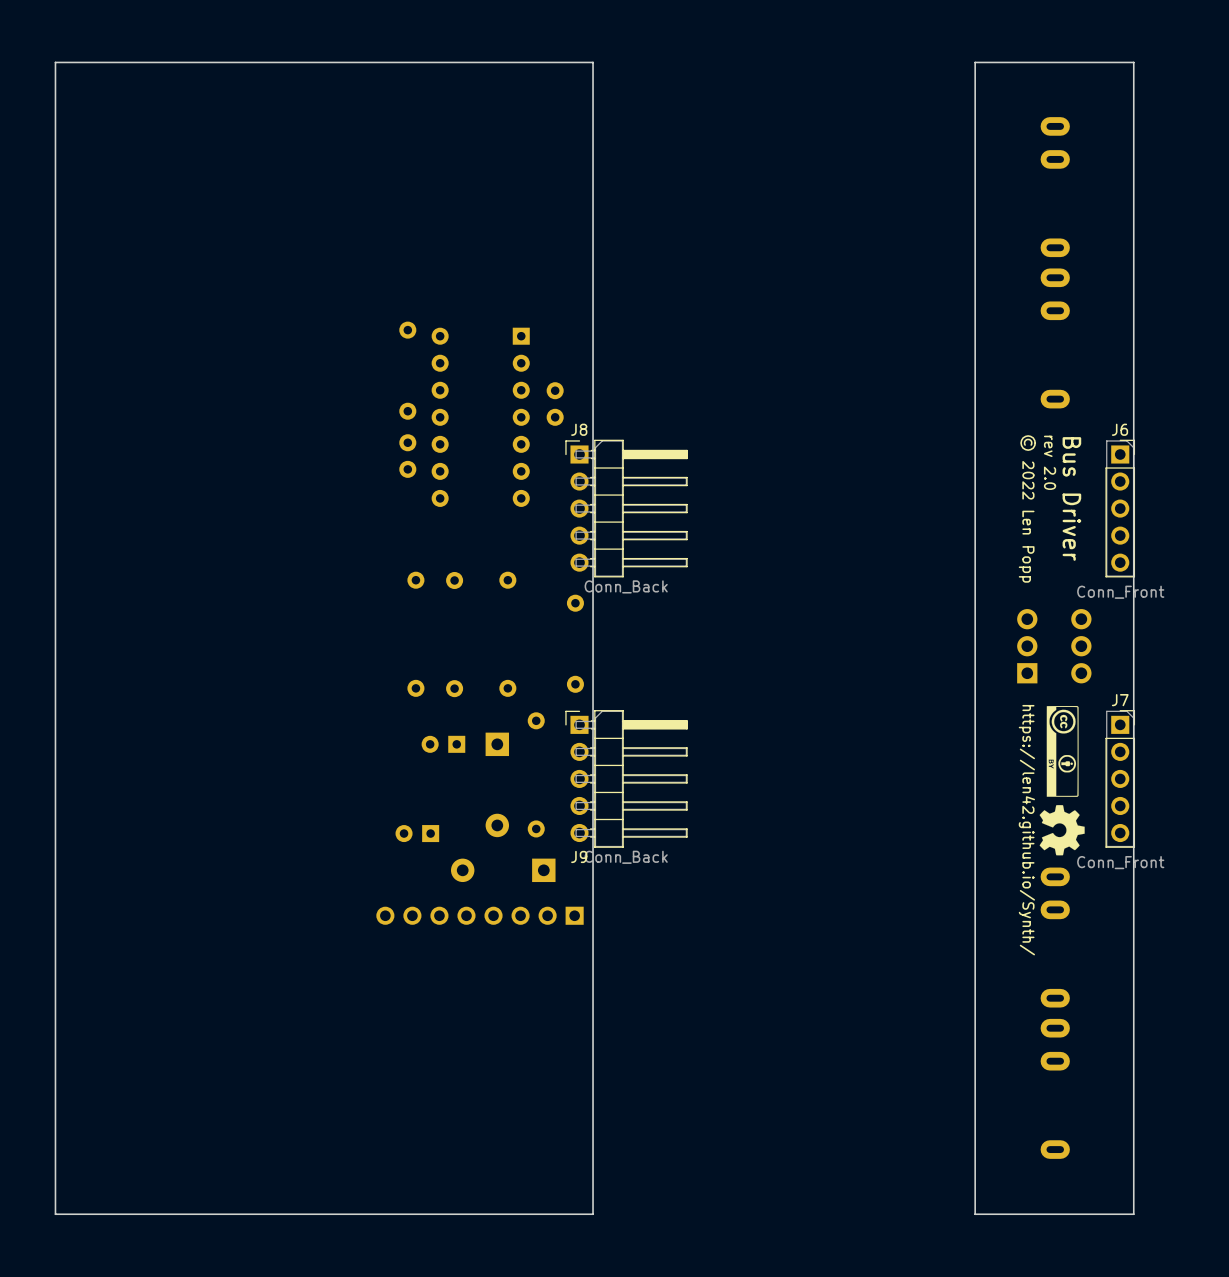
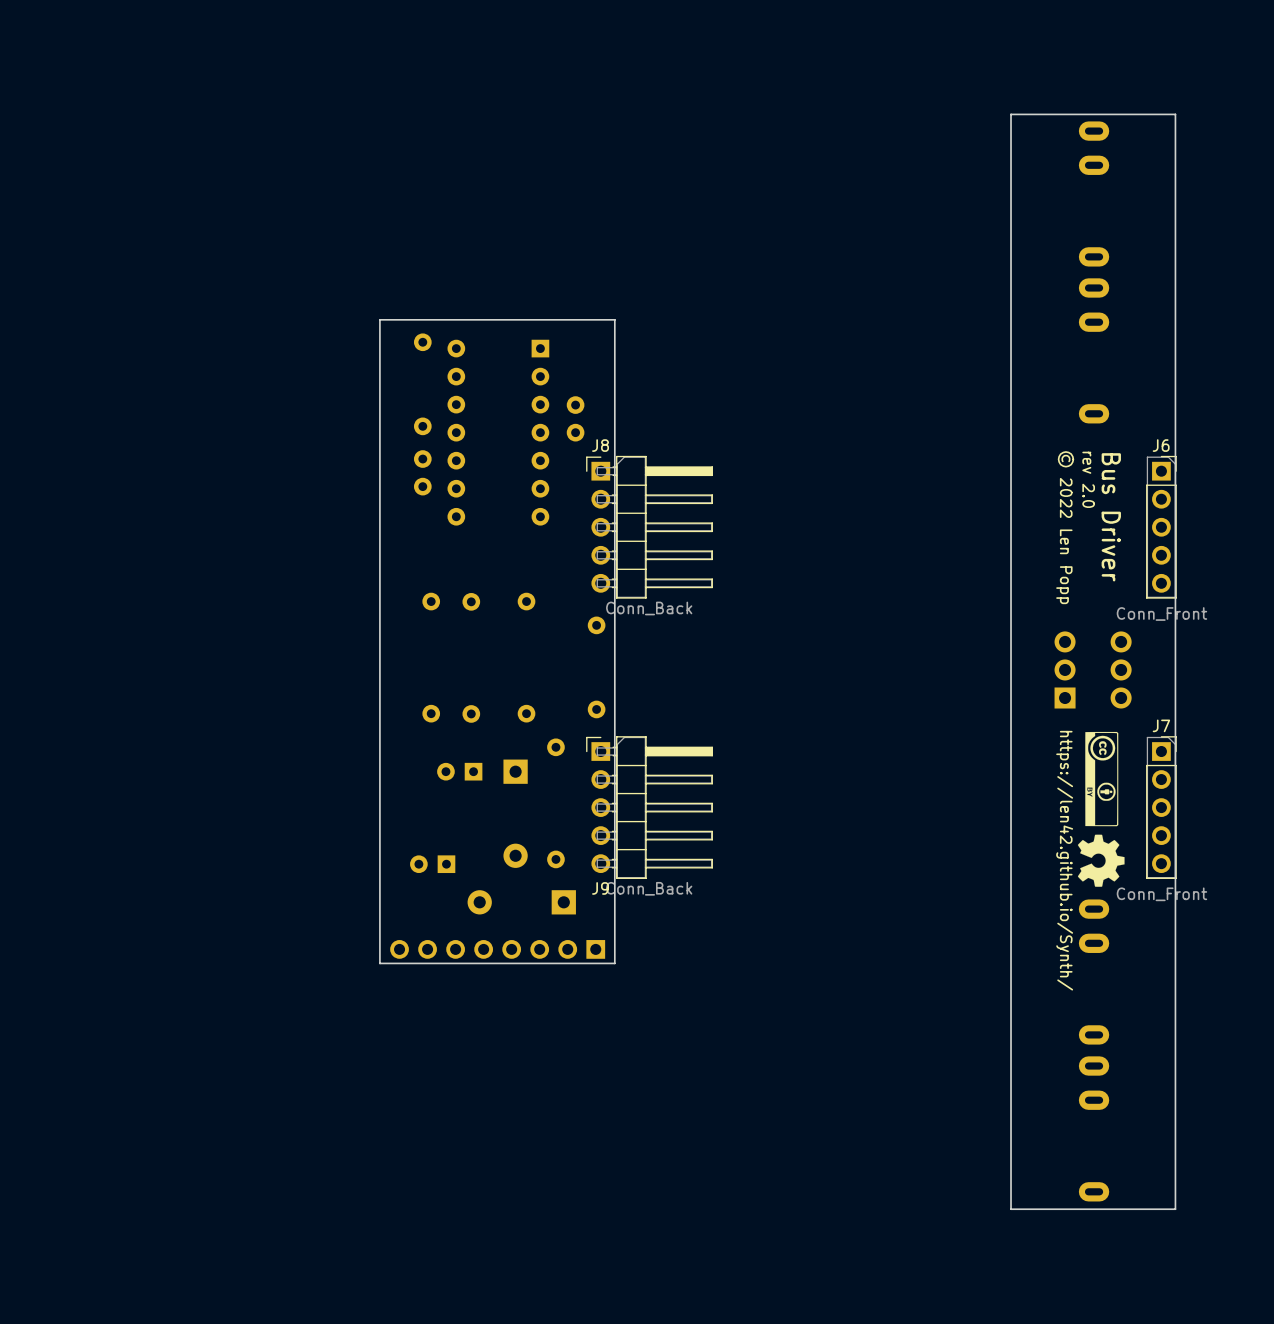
board edge: (1133, 110) (1133, 62) (975, 62) (975, 110) -> (1175, 114) (1011, 114)
board edge: (593, 308) (593, 62) (55, 62) (55, 1214) (593, 1214) (593, 929) -> (614, 319) (379, 319) (379, 963) (614, 963)
board edge: (1133, 1166) (1133, 1214) (975, 1214) (975, 1166) -> (1175, 1209) (1011, 1209)

